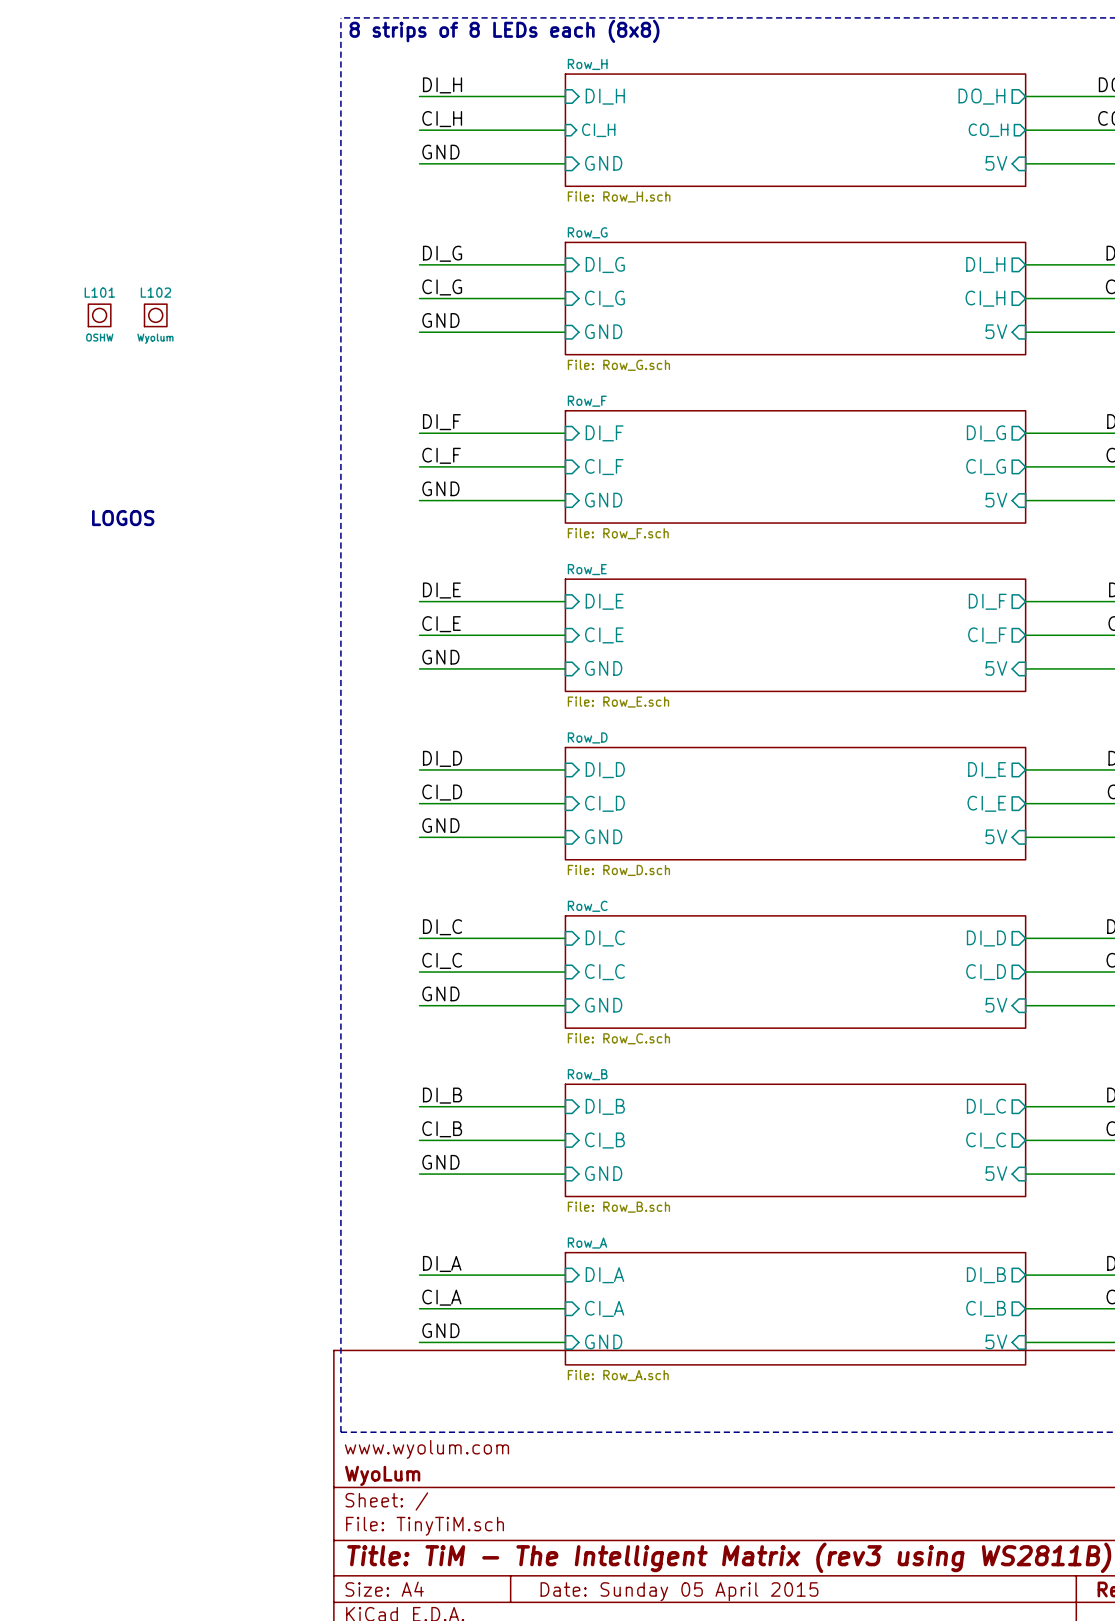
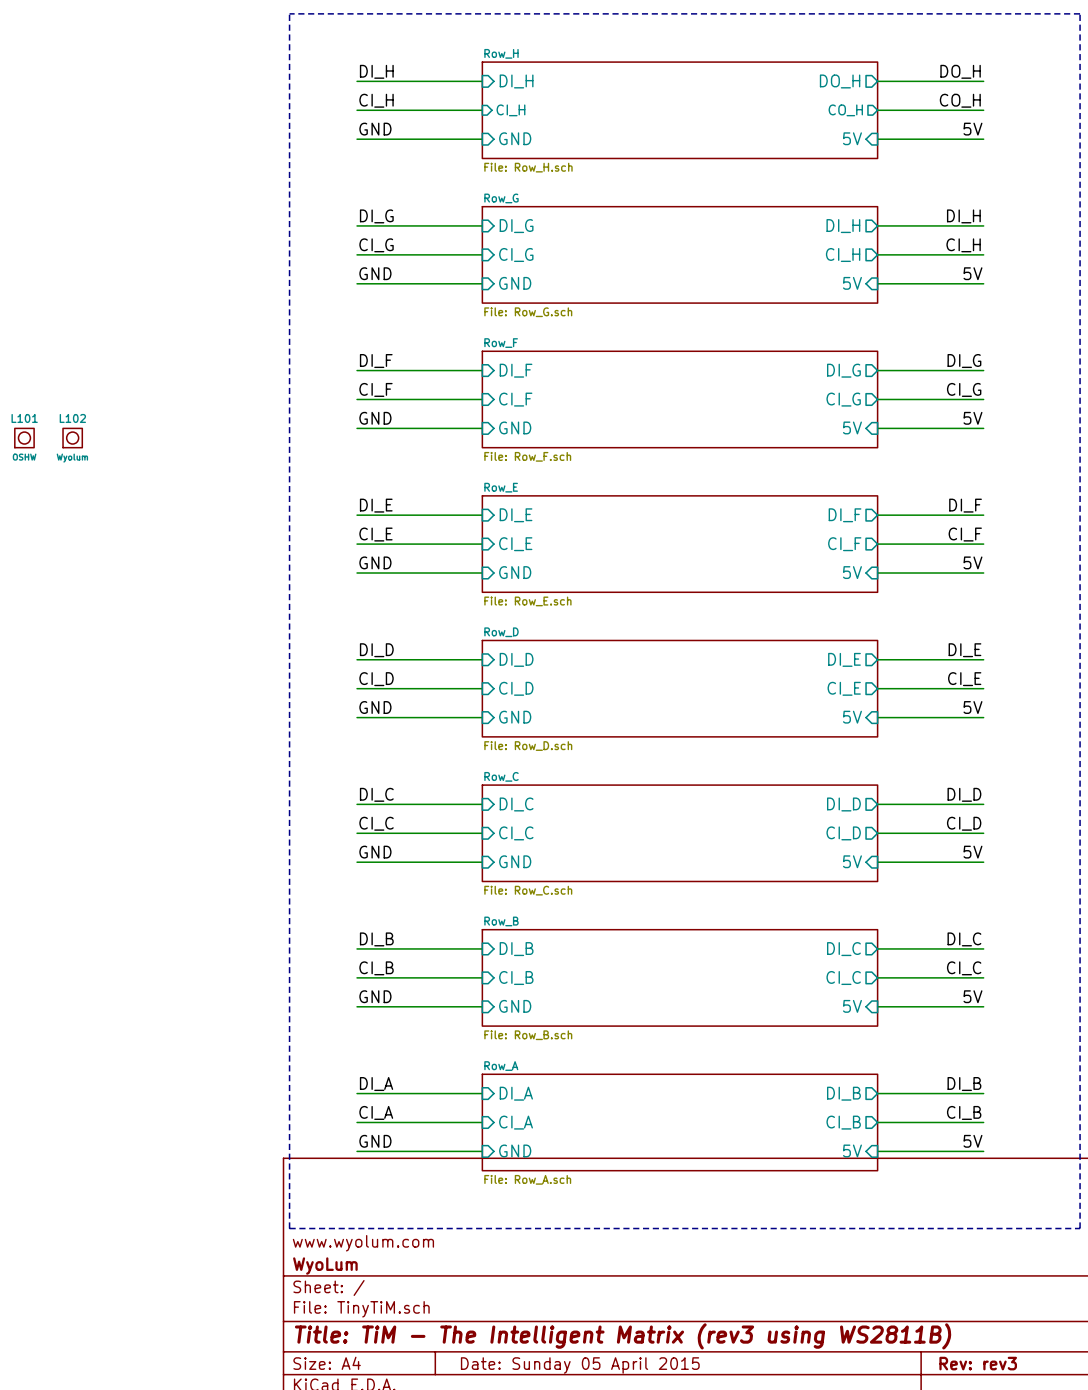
text: 8 strips of 8 LEDs each (8x8) (504, 31) -> none
L101 position: (99, 315) -> (24, 438)
L102 position: (155, 315) -> (72, 438)
text: LOGOS (123, 518) -> none

